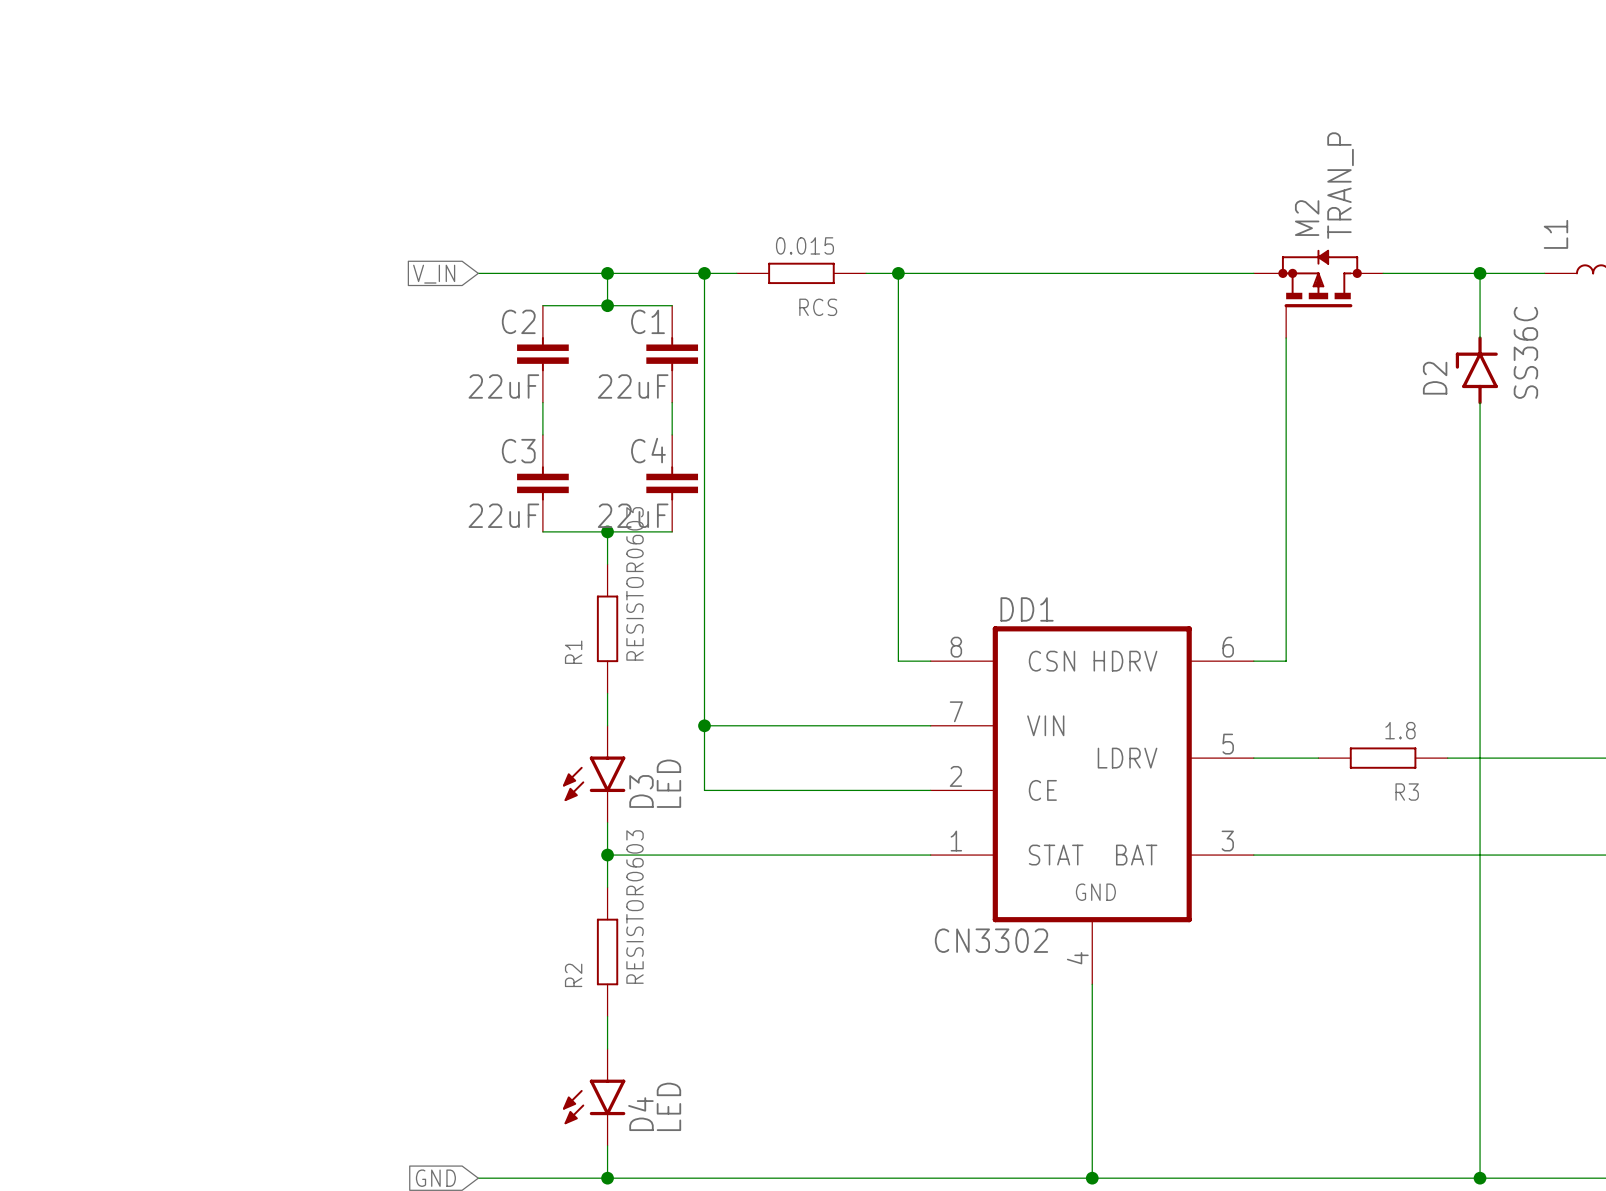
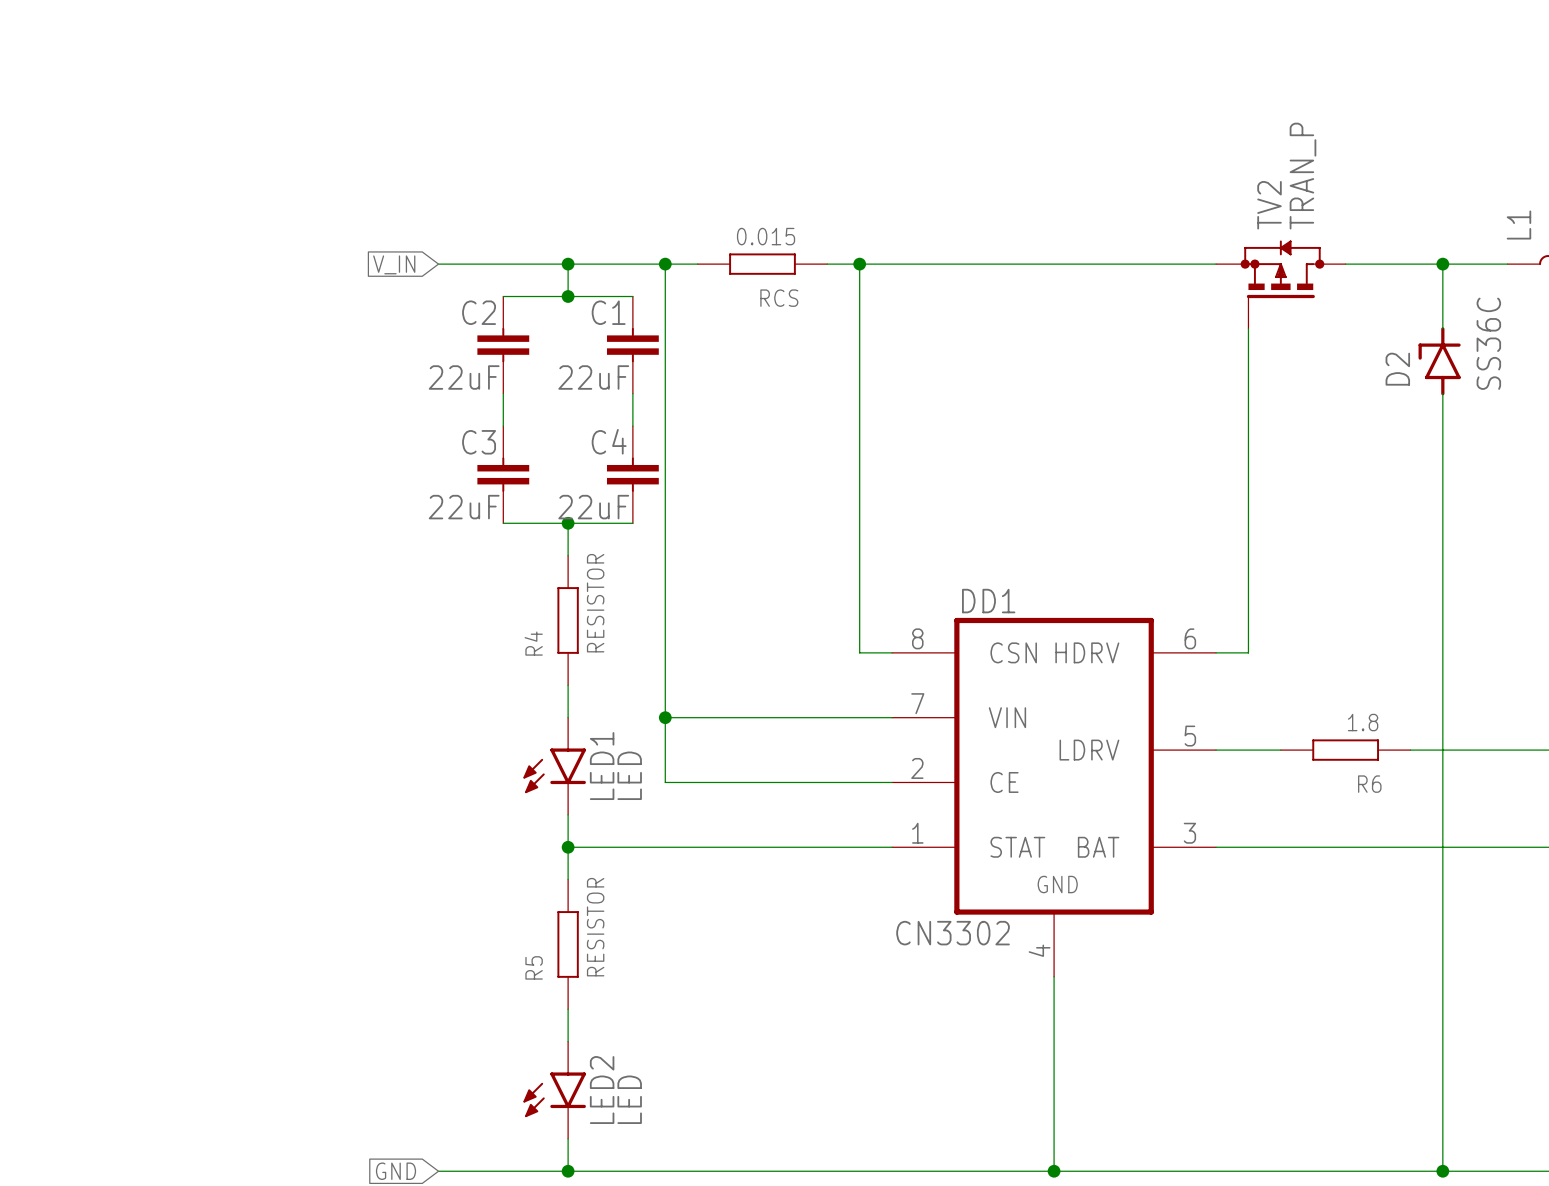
M2 name: M2 (1307, 218) -> TV2 (1269, 205)
R1 value: RESISTOR0603 (635, 583) -> RESISTOR (595, 603)
R1 name: R1 (573, 652) -> R4 (533, 643)
D3 name: D3 (641, 791) -> LED1 (602, 766)
R3 name: R3 (1407, 792) -> R6 (1369, 784)
R2 value: RESISTOR0603 (635, 907) -> RESISTOR (595, 927)
R2 name: R2 (573, 975) -> R5 (534, 967)
D4 name: D4 (640, 1114) -> LED2 (602, 1090)

